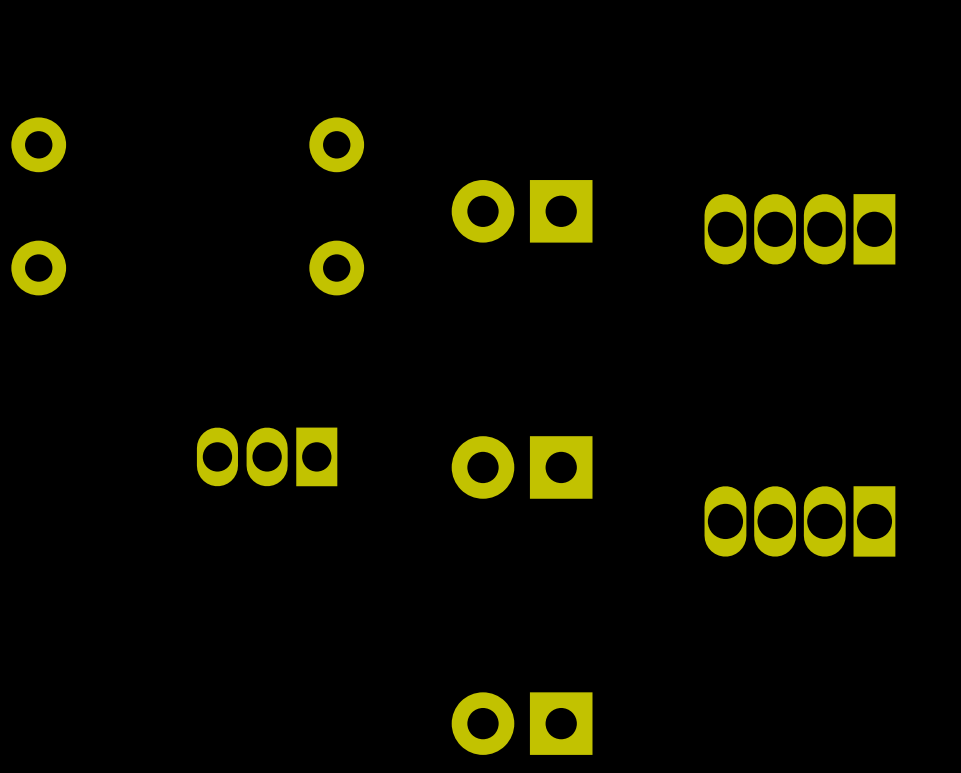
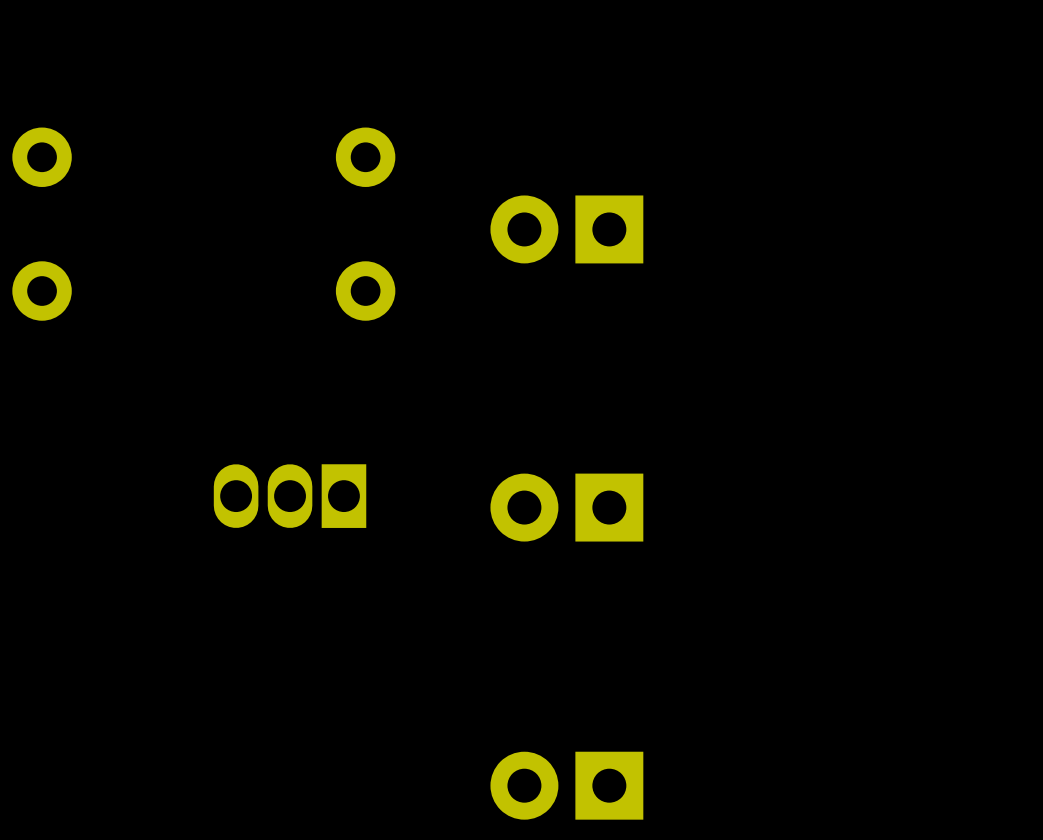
part: (799, 229) -> none
part: (799, 521) -> none

